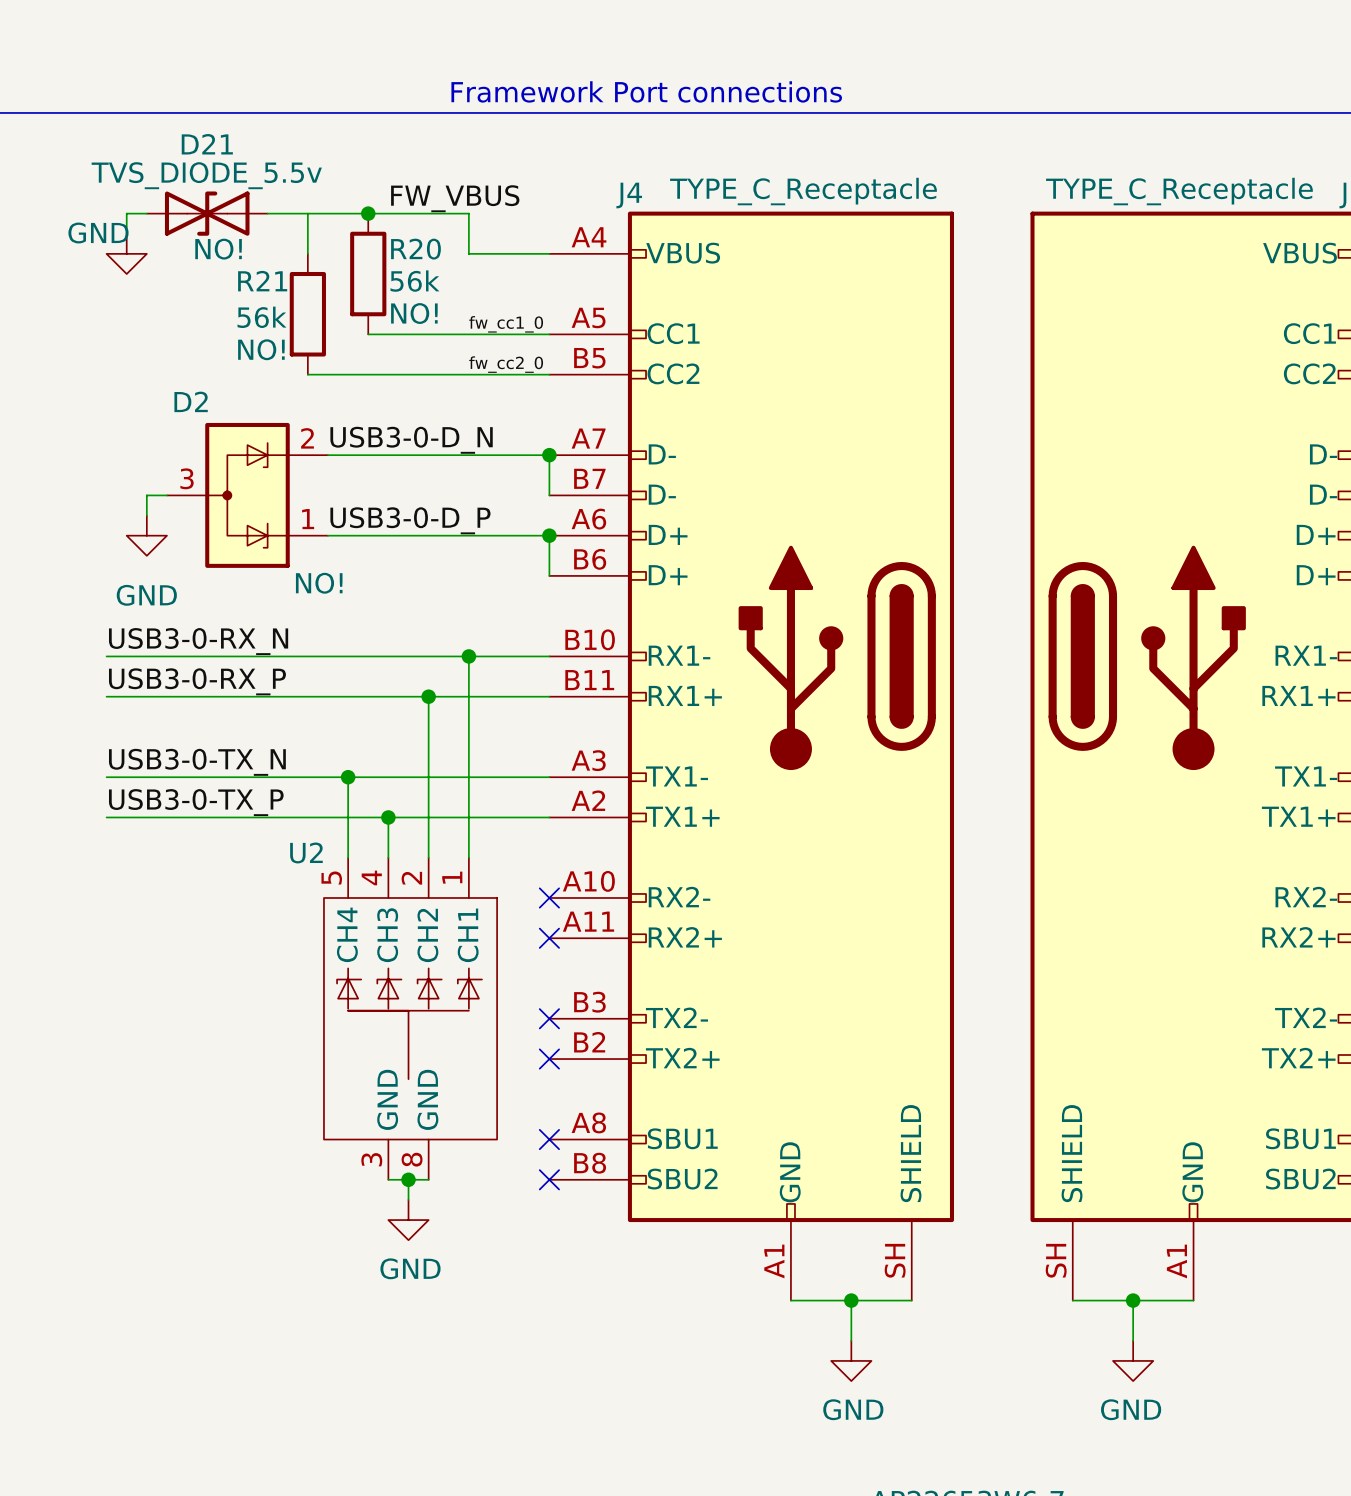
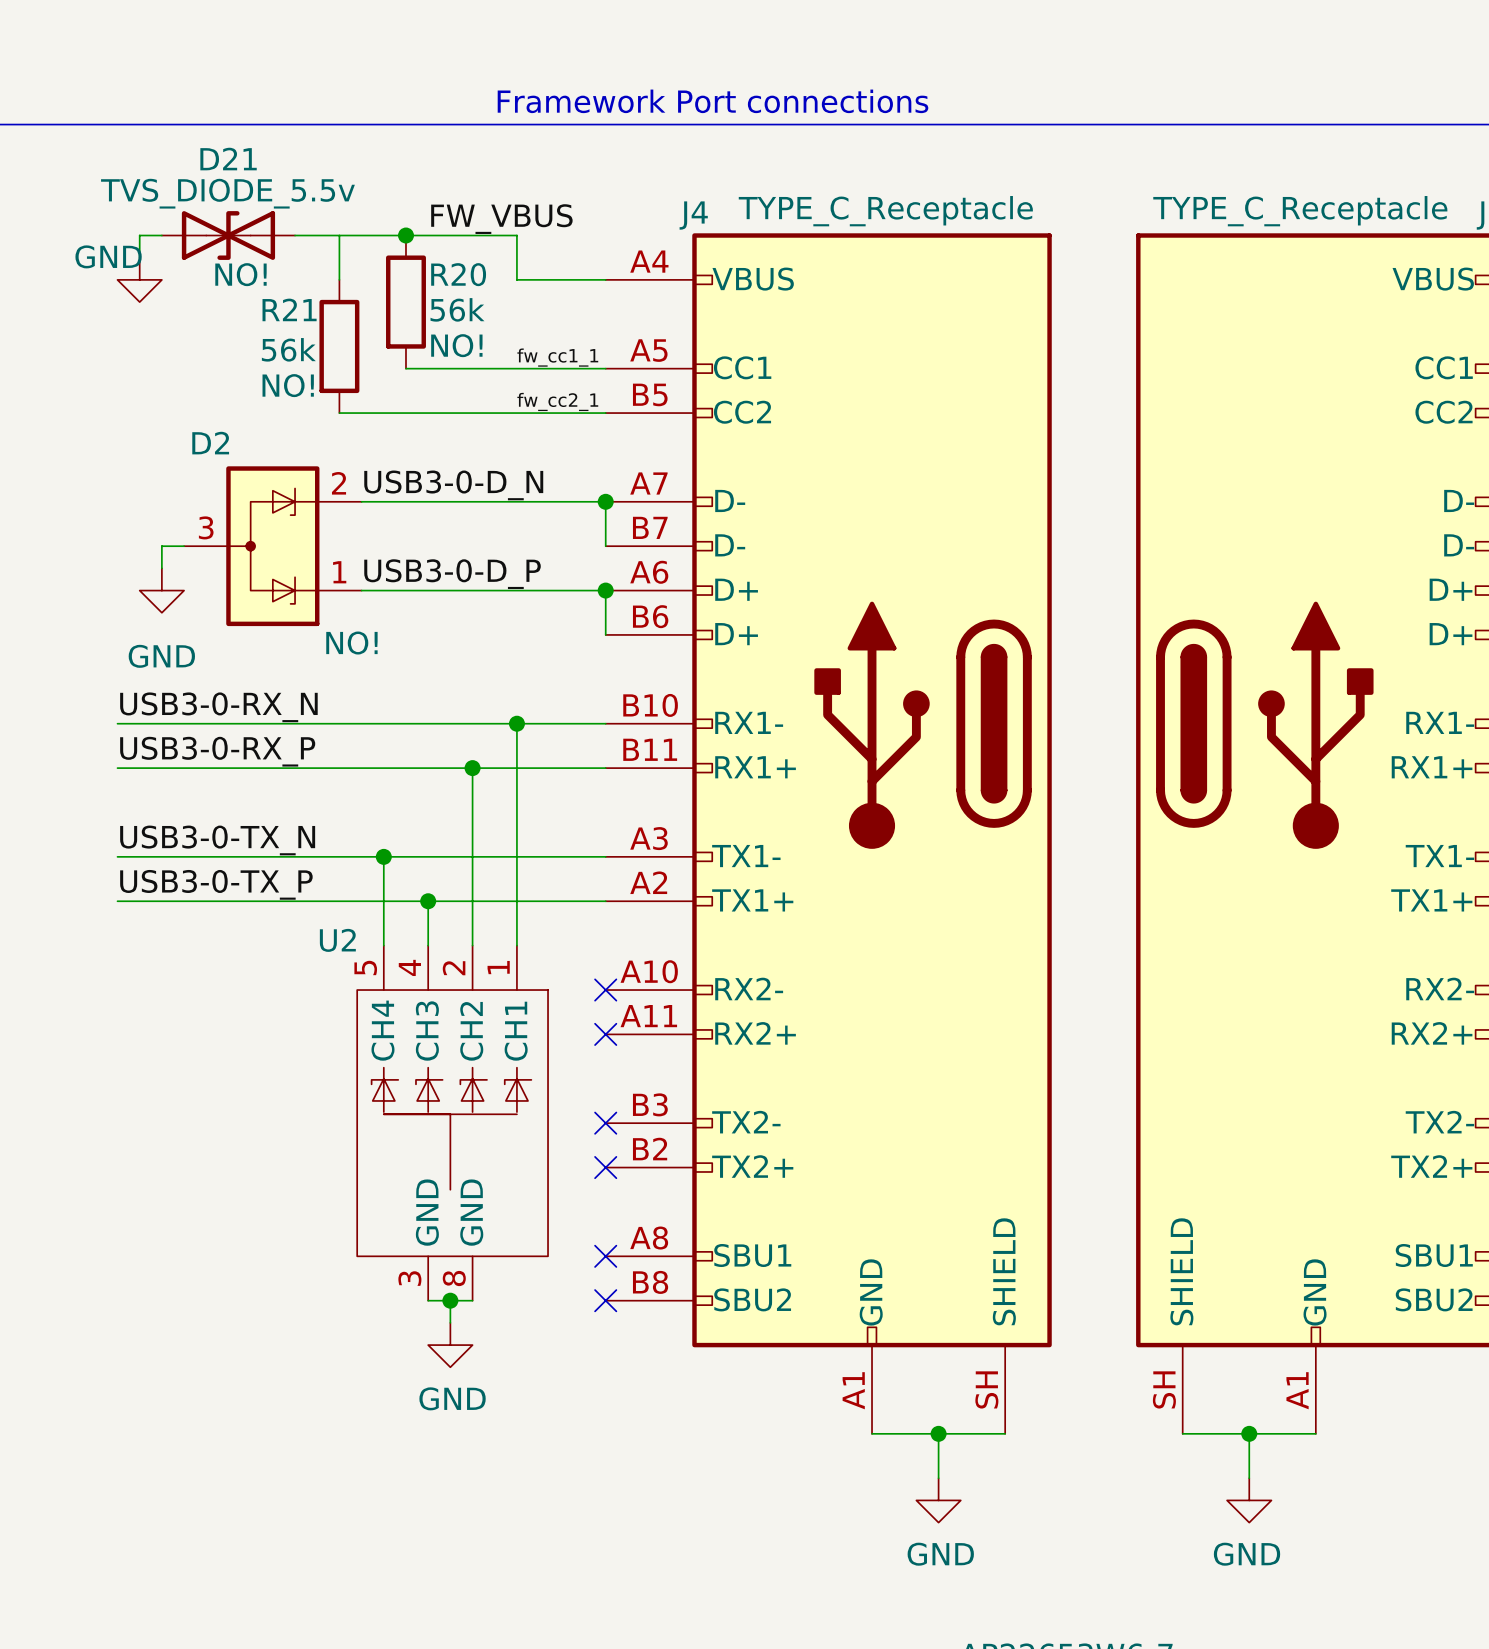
label: fw_cc1_0 (506, 324) -> fw_cc1_1 (557, 357)
label: fw_cc2_0 (506, 364) -> fw_cc2_1 (557, 401)

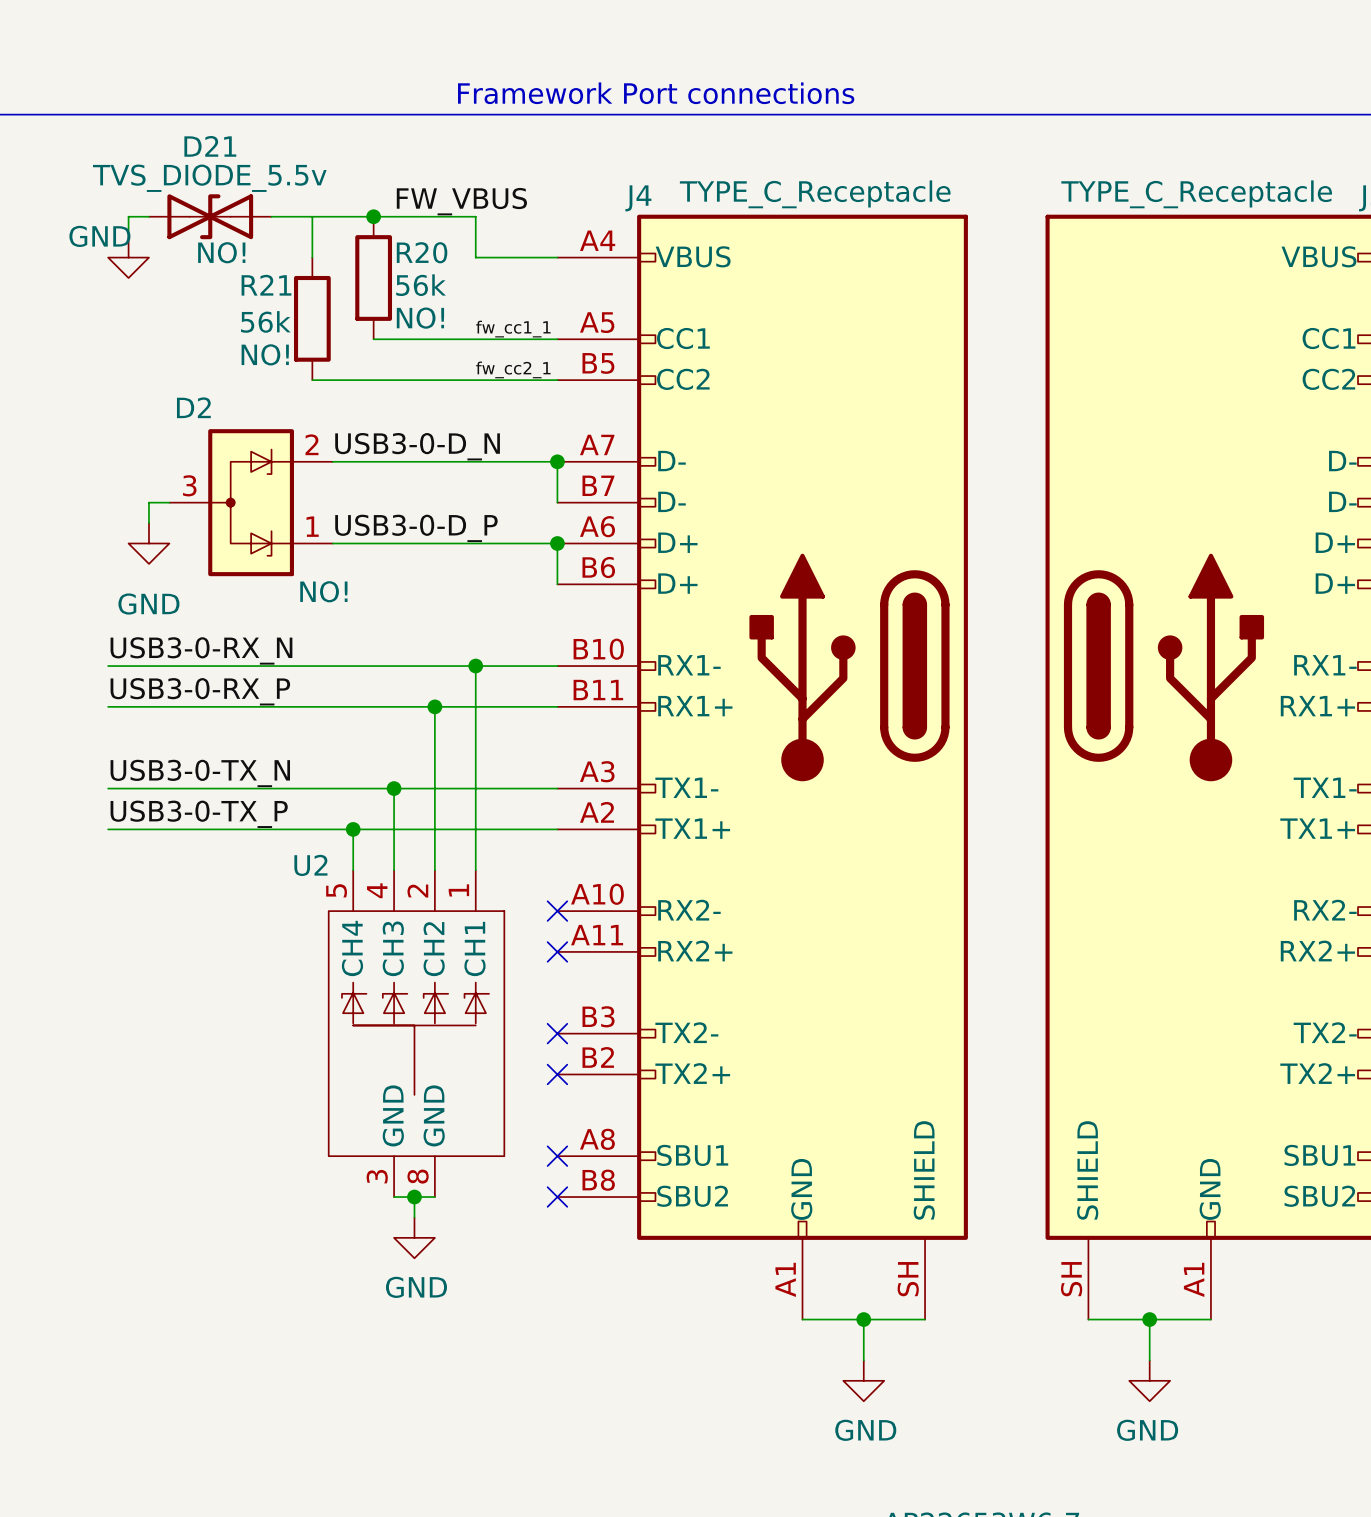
wire: (383, 856) (383, 901) -> (394, 788) (394, 829)
junction: (383, 856) -> none
junction: none -> (394, 788)
junction: none -> (353, 829)
junction: (428, 901) -> none

